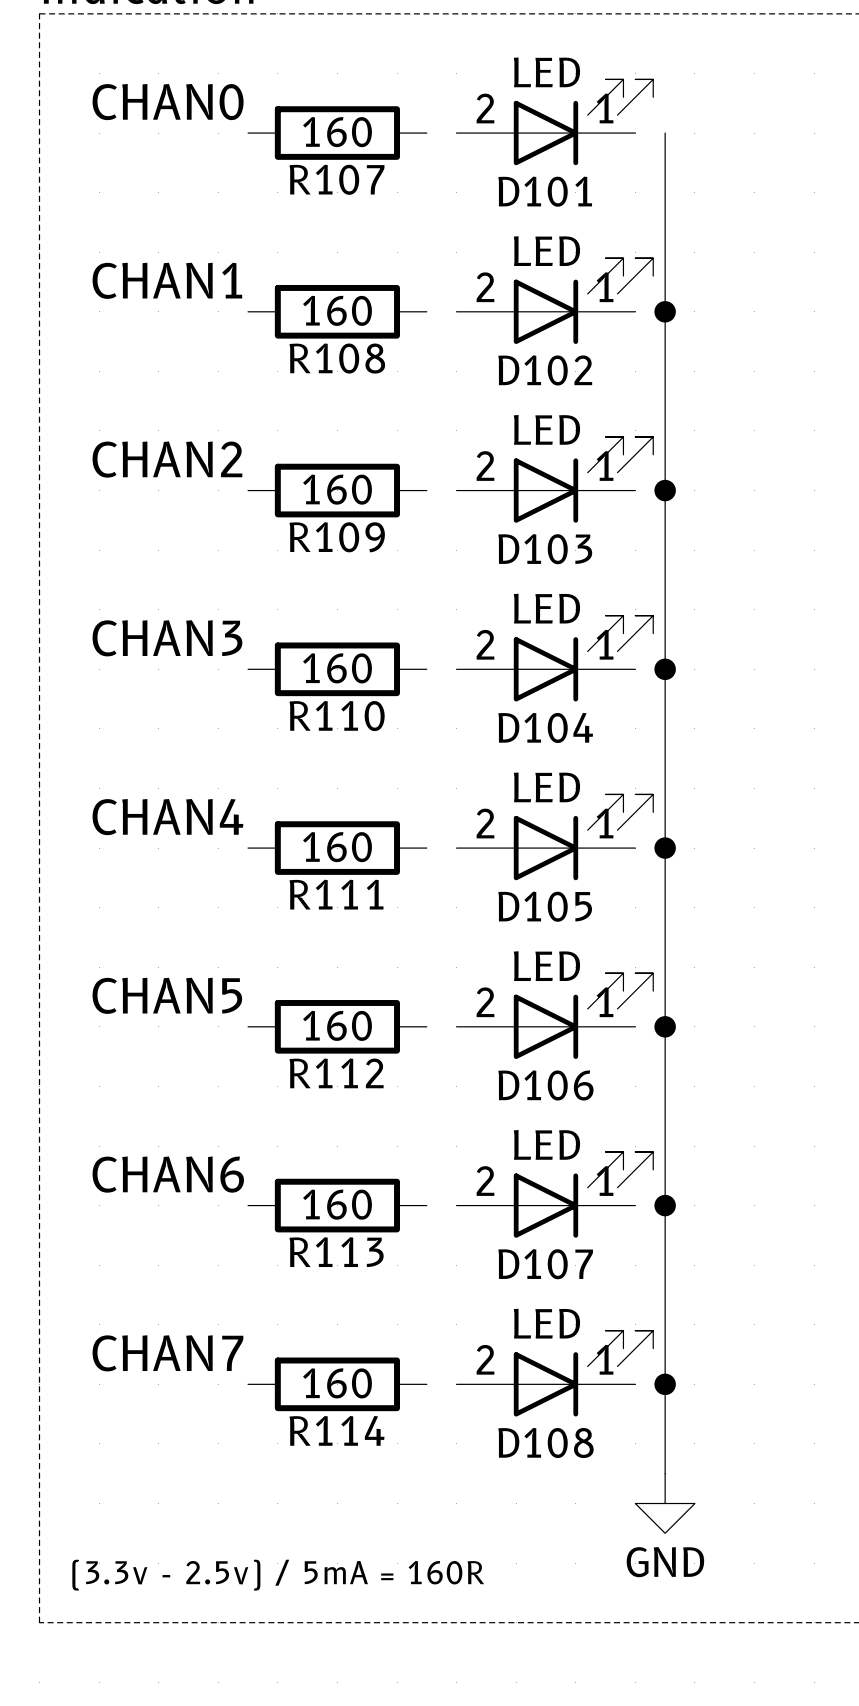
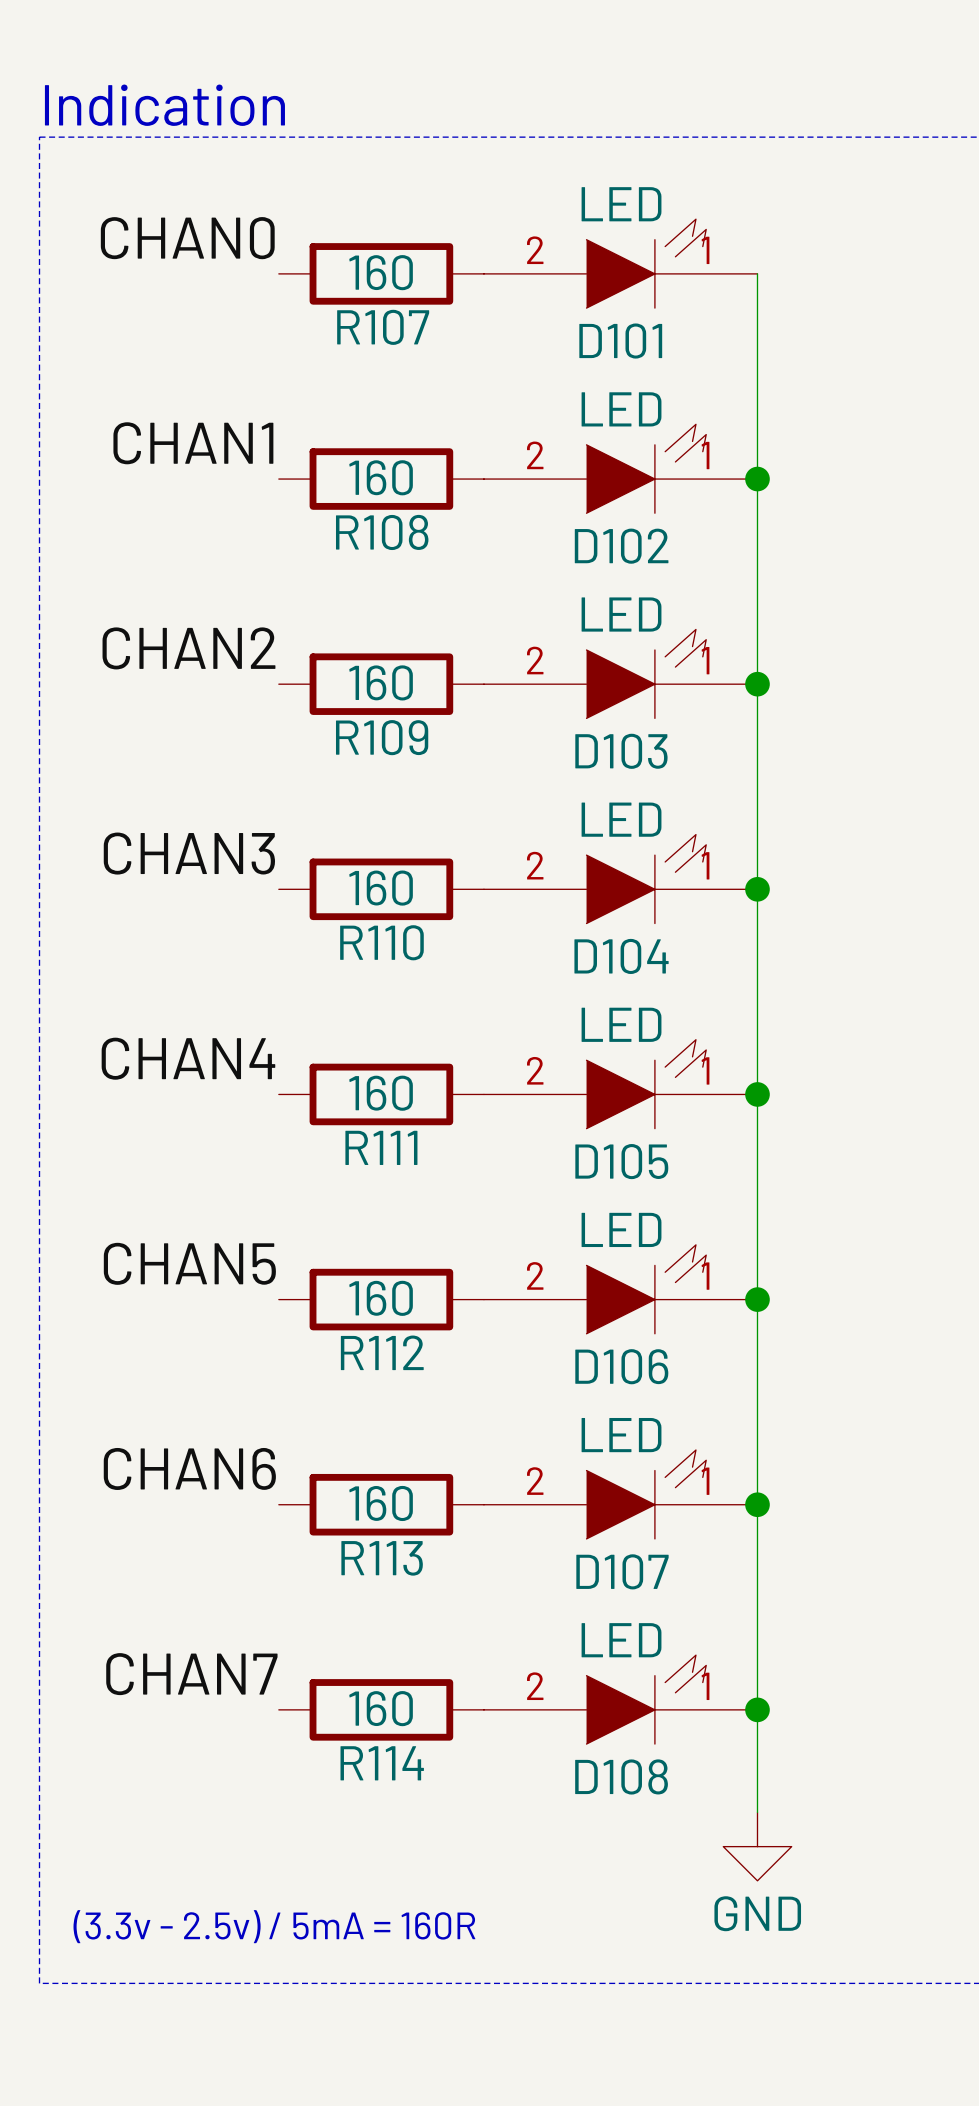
D101 symbol: [456, 79, 654, 166] -> [483, 219, 758, 309]
D102 symbol: [456, 258, 654, 344] -> [483, 424, 758, 514]
D103 symbol: [456, 436, 654, 523] -> [483, 629, 758, 719]
D104 symbol: [456, 615, 654, 702] -> [483, 834, 758, 924]
D105 symbol: [456, 794, 654, 881] -> [483, 1039, 758, 1129]
D106 symbol: [456, 973, 654, 1060] -> [483, 1244, 758, 1334]
D107 symbol: [456, 1151, 654, 1238] -> [483, 1450, 758, 1539]
D108 symbol: [456, 1330, 654, 1417] -> [483, 1655, 758, 1745]

